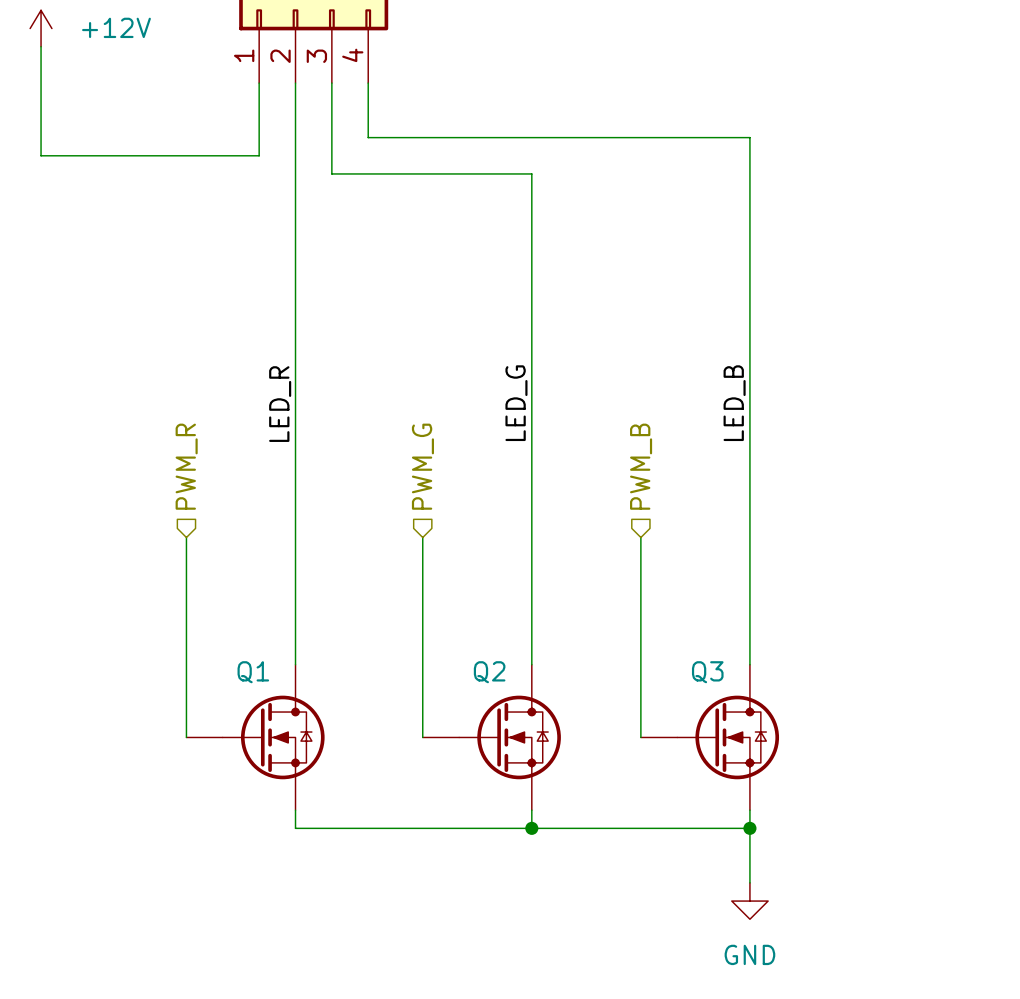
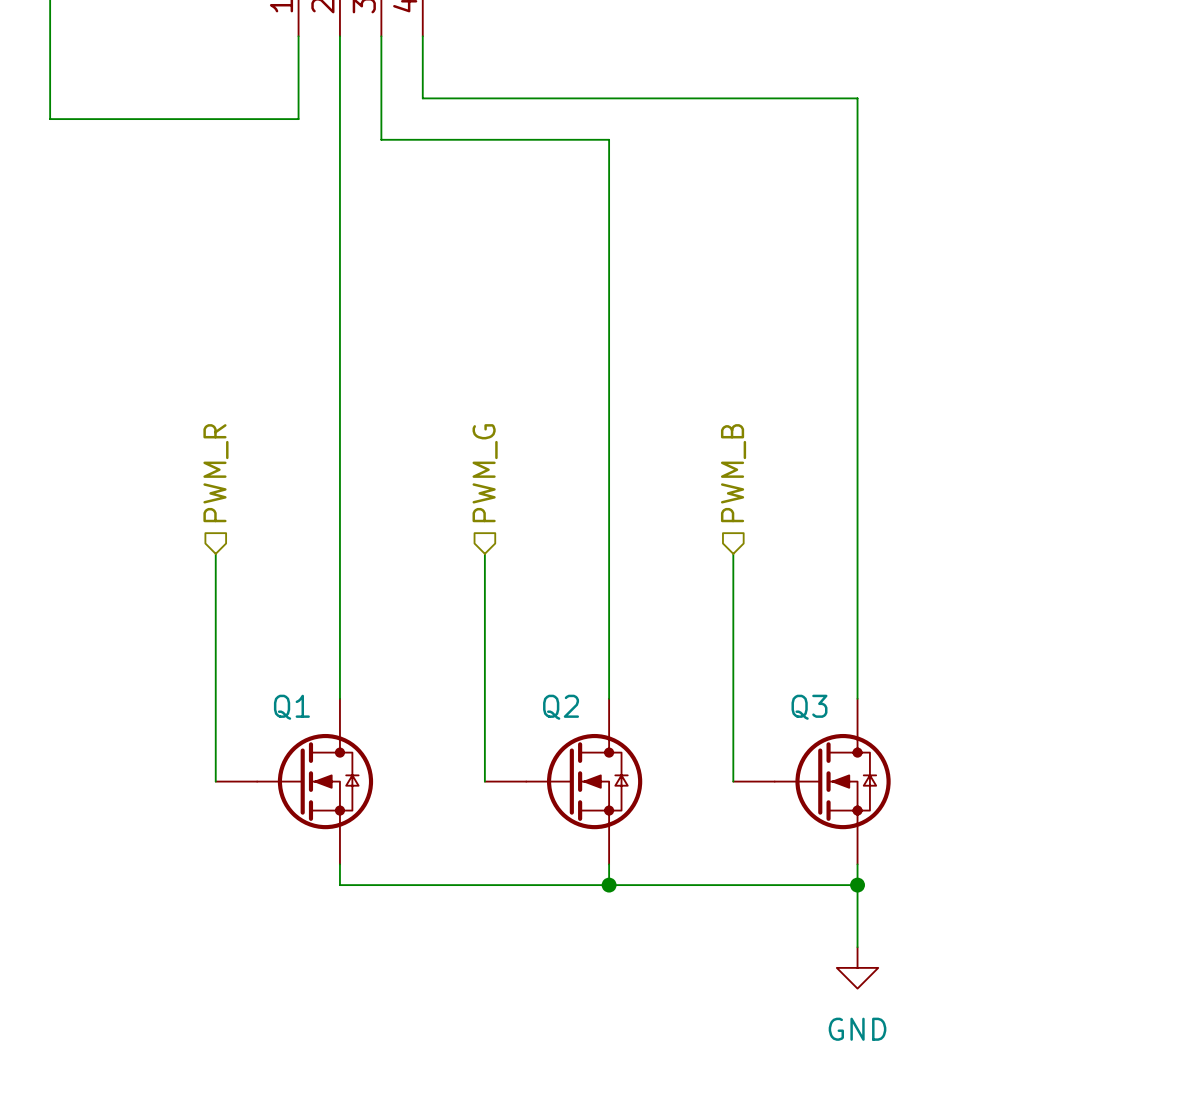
label: LED_G (516, 403) -> none
label: LED_B (734, 403) -> none
label: LED_R (280, 404) -> none

